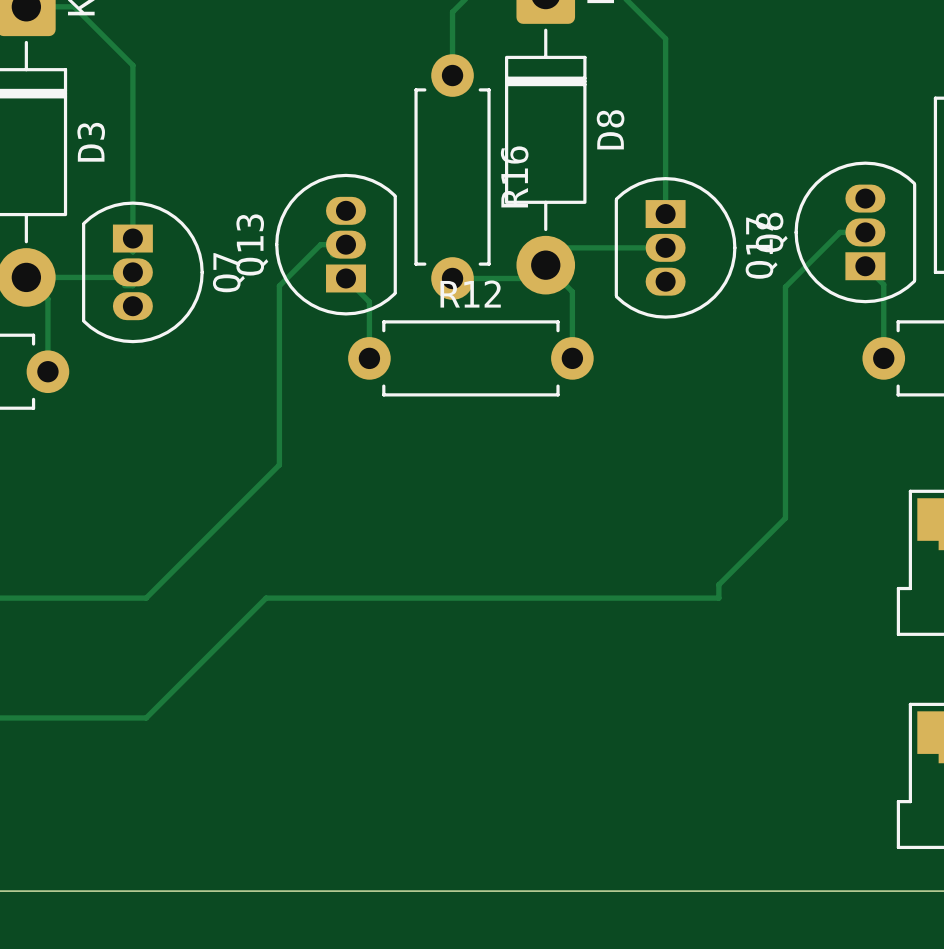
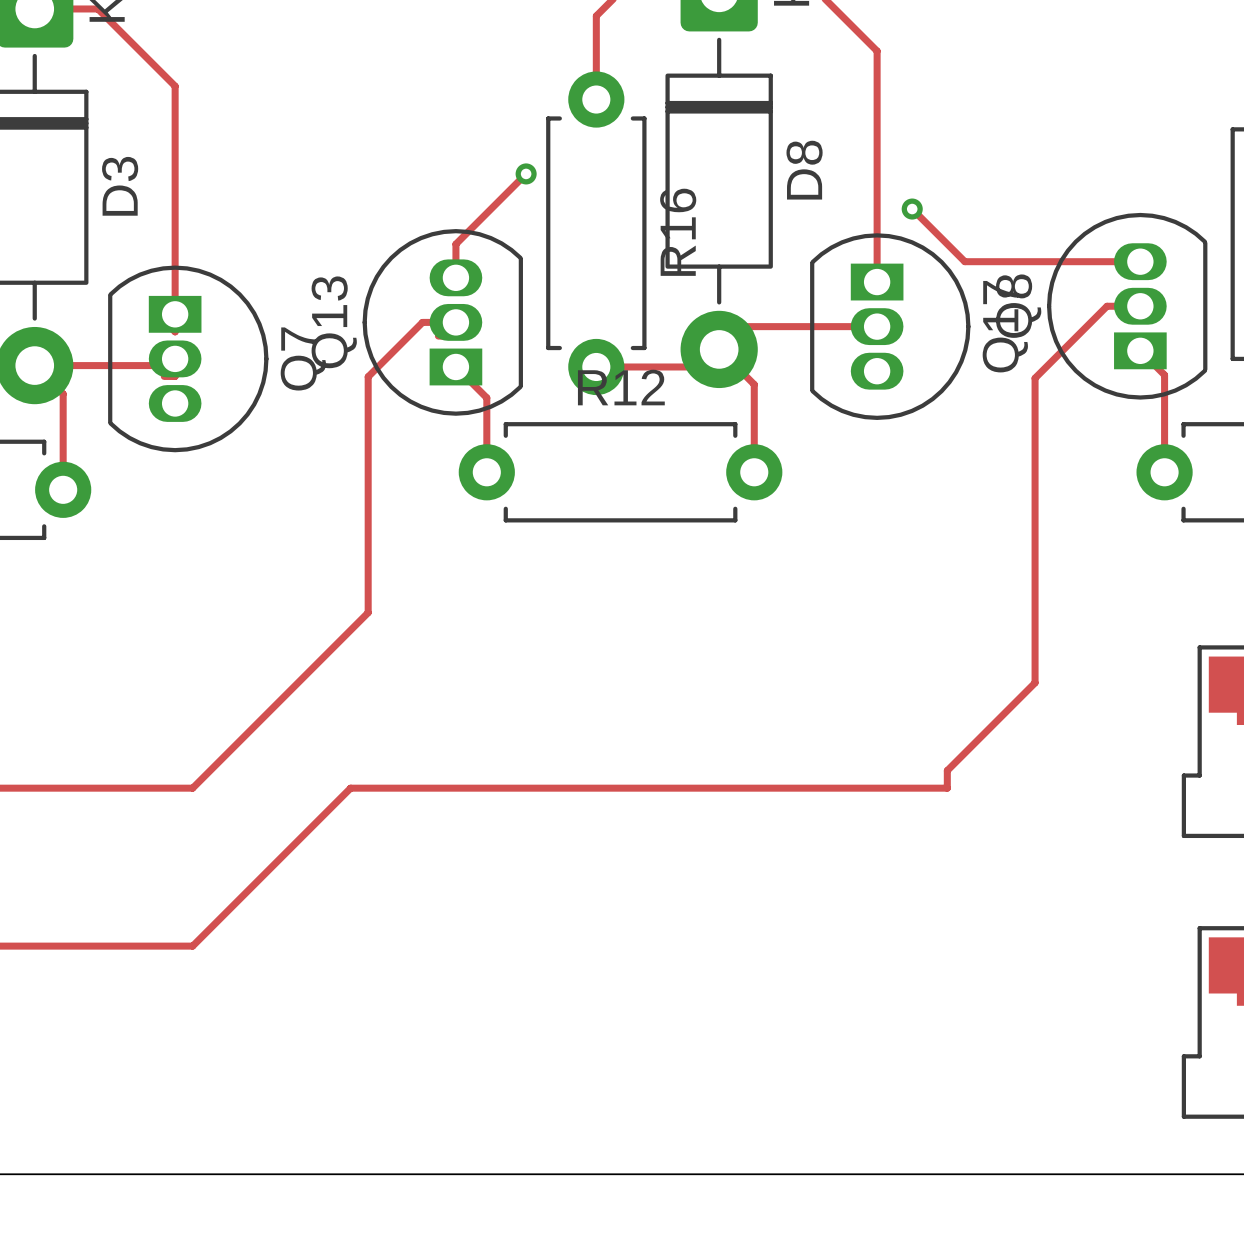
track: none -> (526, 173) (455, 244) (455, 277)
via: none -> (526, 173)
track: none -> (912, 209) (964, 261) (1140, 261)
via: none -> (912, 209)

